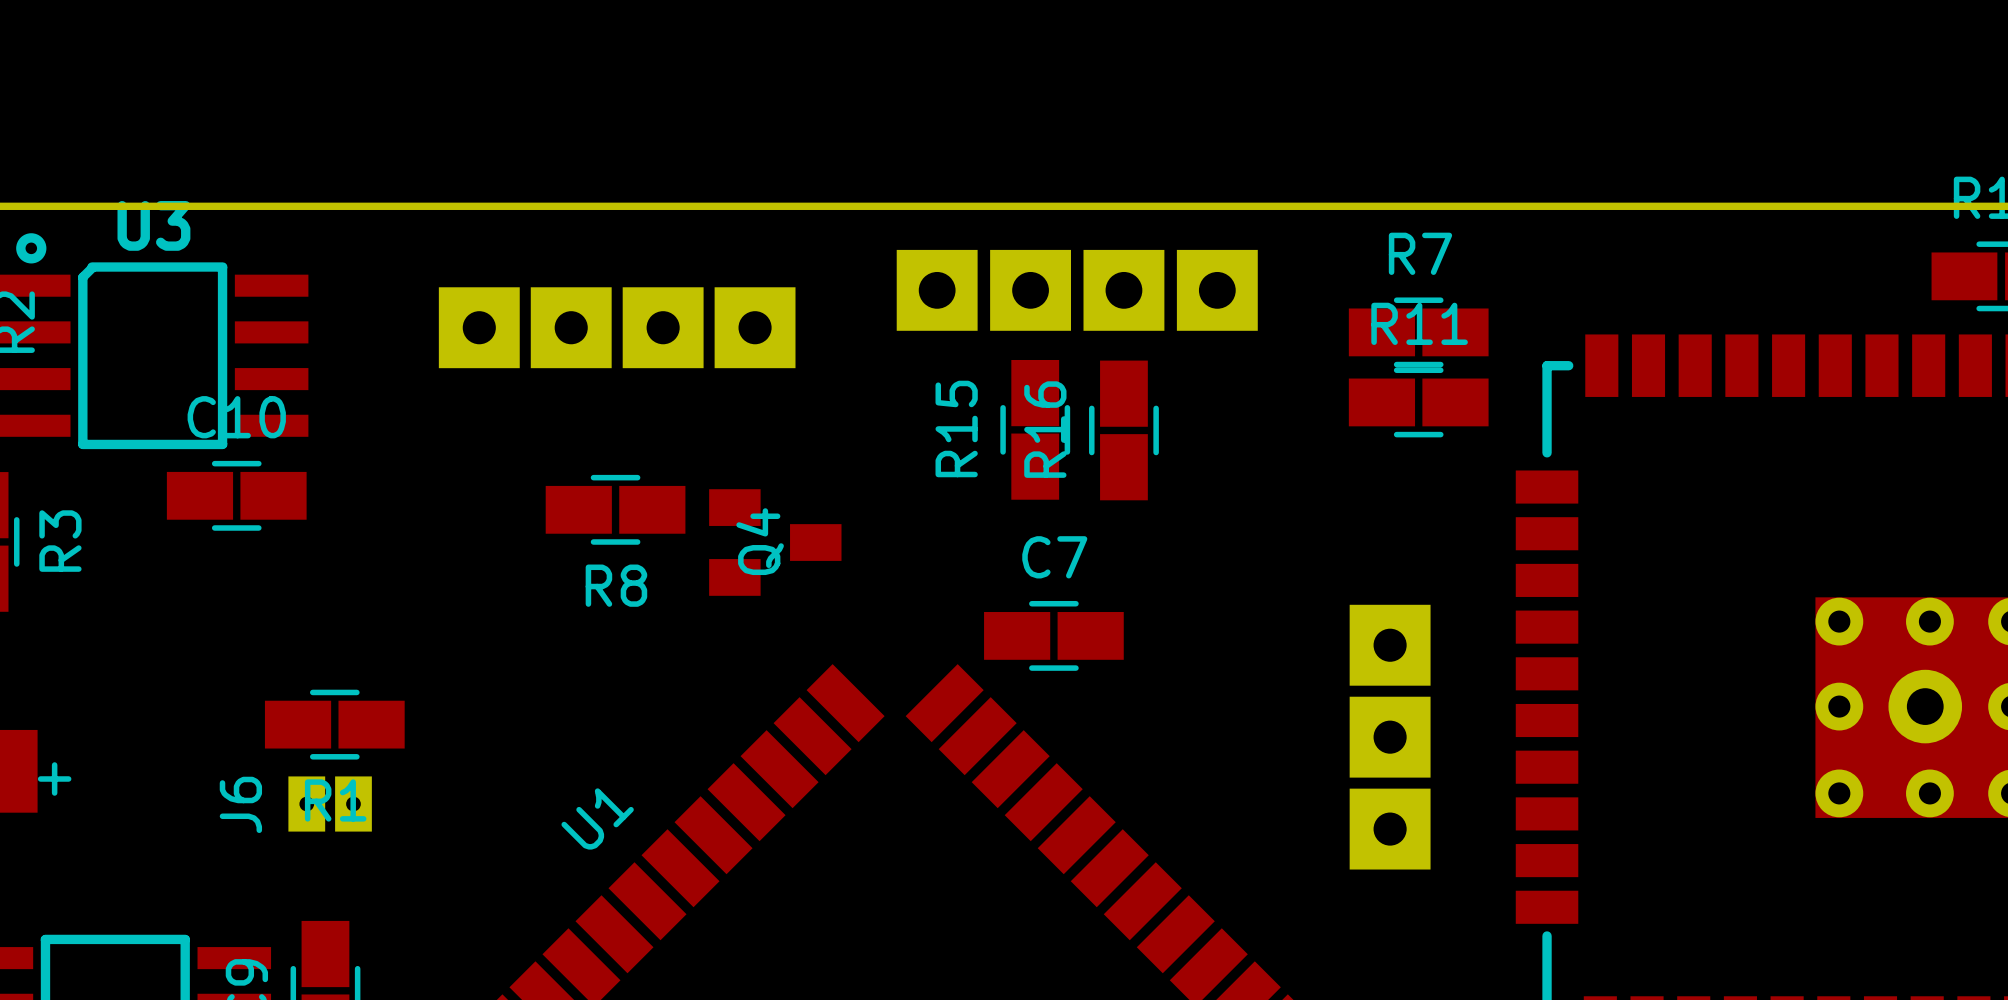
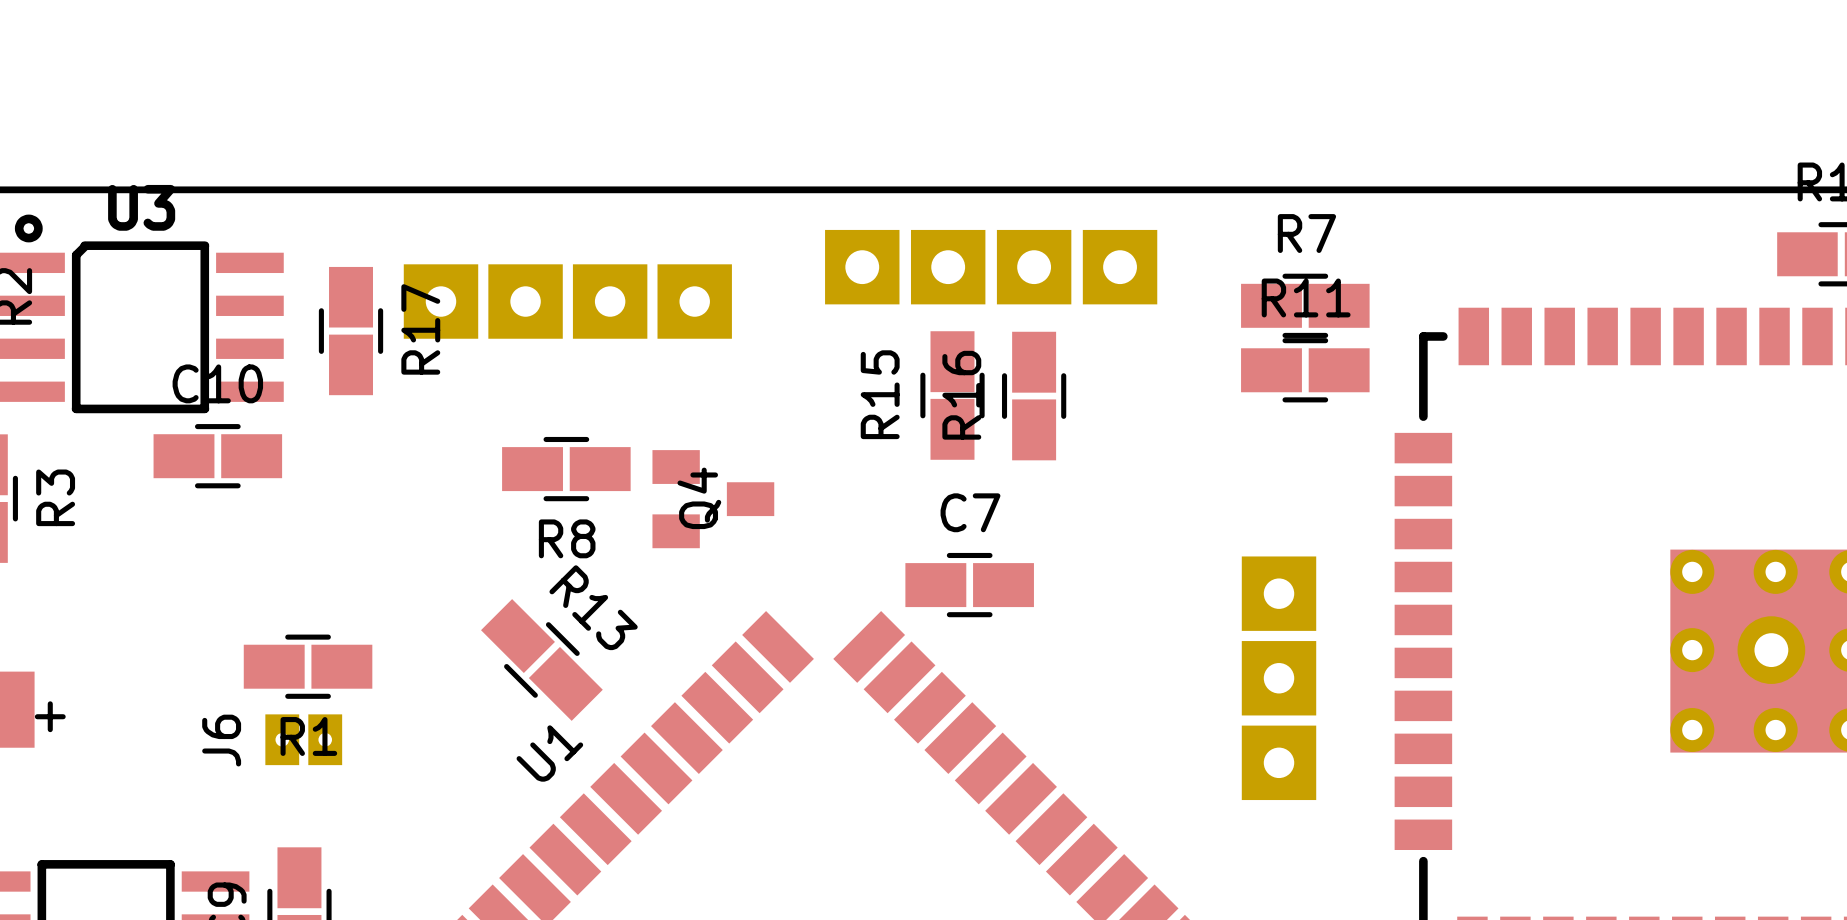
R17: none -> (351, 331)
R13: none -> (541, 659)

